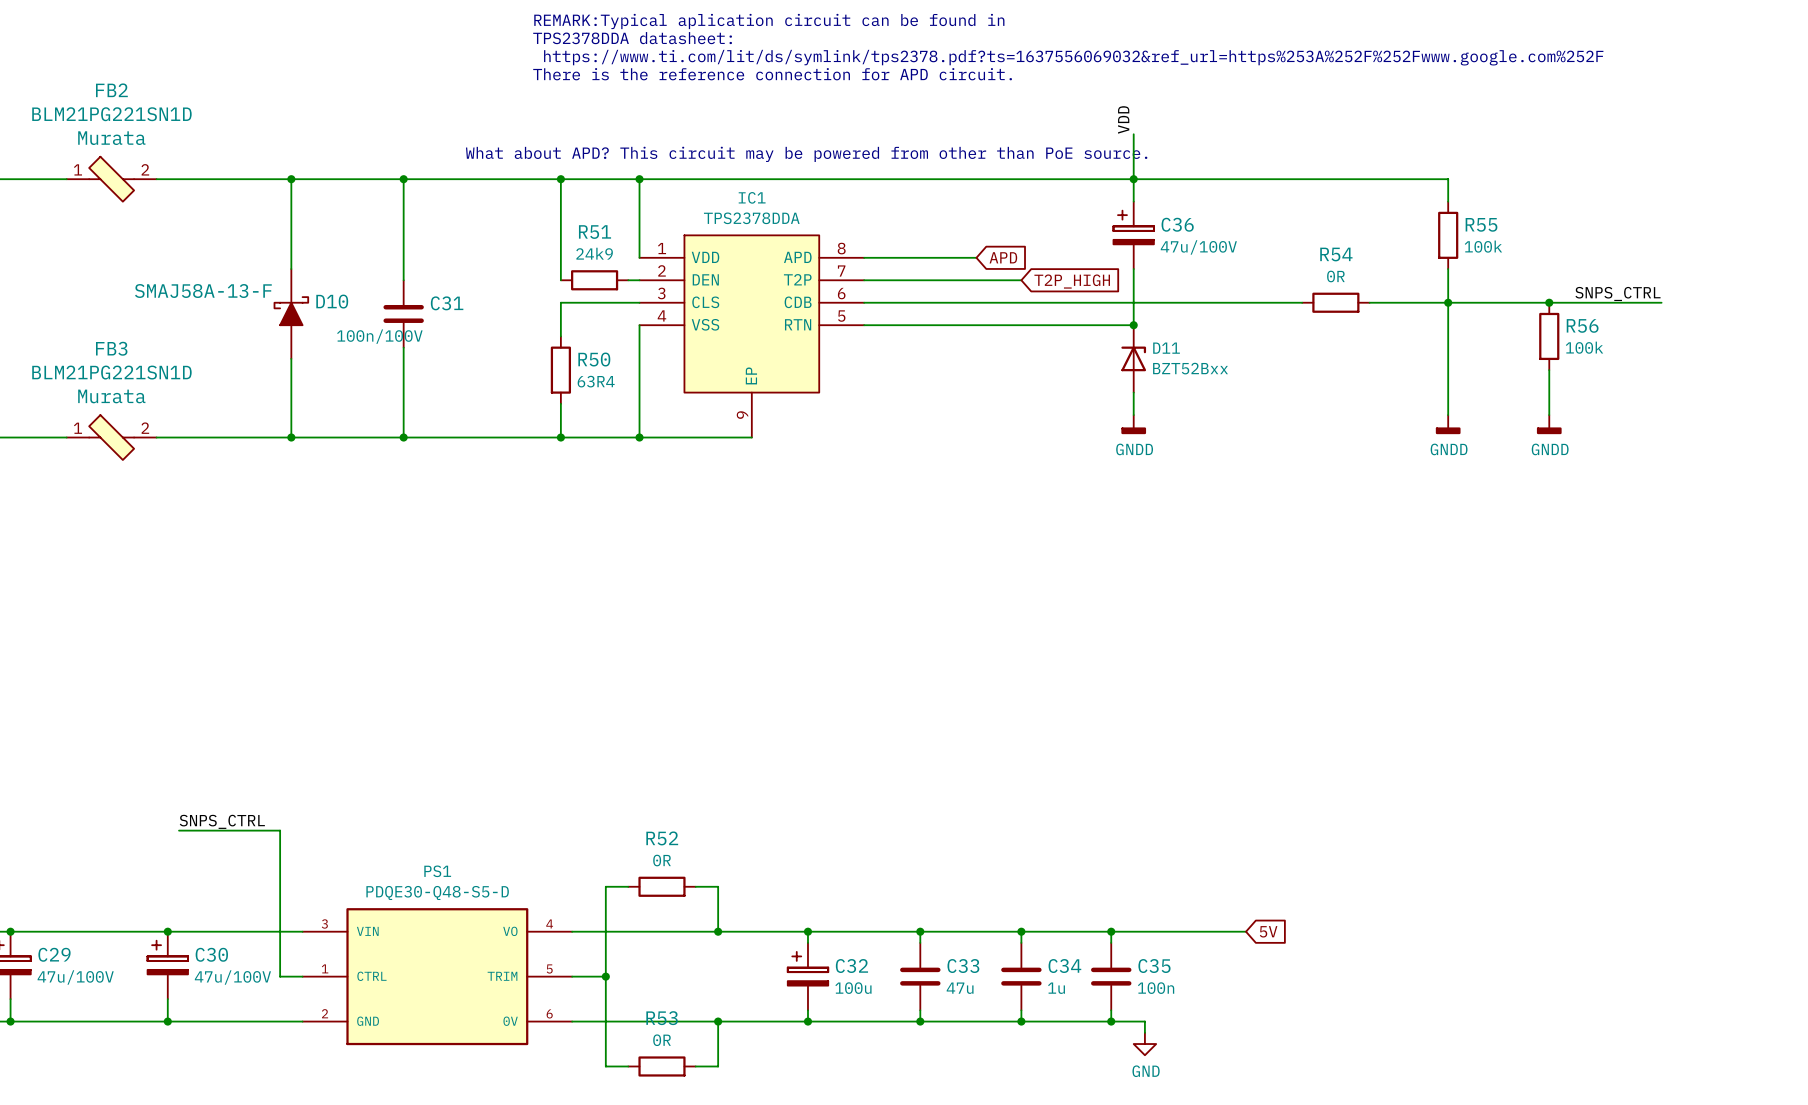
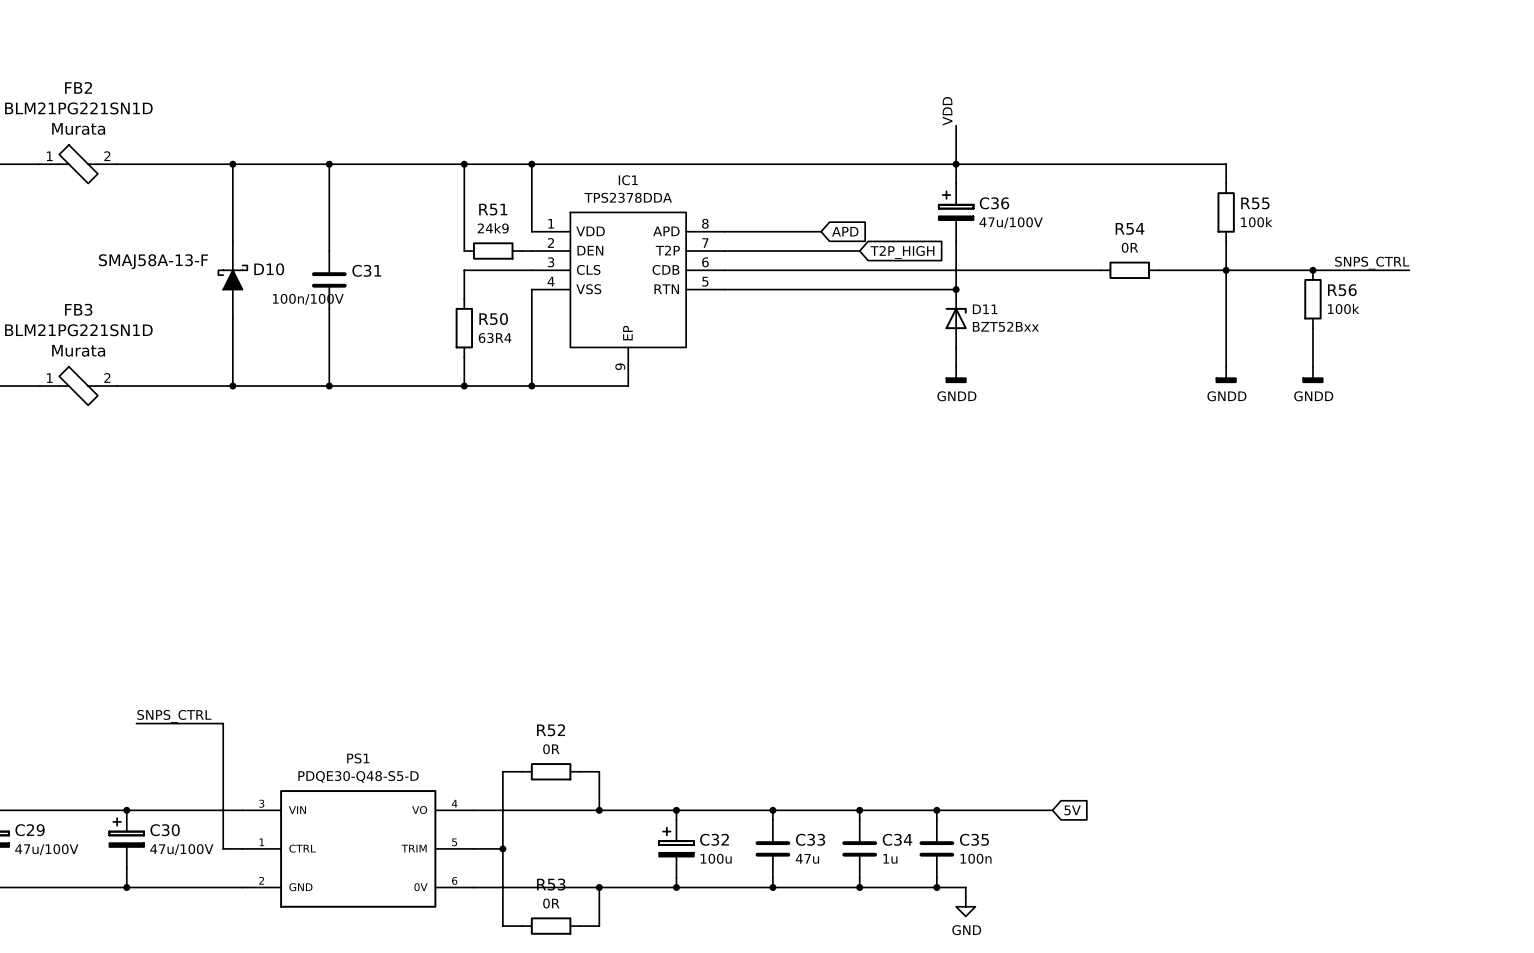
text: REMARK:Typical aplication circuit can be found in (769, 21) -> none
text: TPS2378DDA datasheet: (632, 38) -> none
text: https://www.ti.com/lit/ds/symlink/tps2378.pdf?ts=1637556069032&ref_url=https%253A%252F%252Fwww.google.com%252F (1073, 57) -> none
text: There is the reference connection for APD circuit. (772, 74) -> none
text: What about APD? This circuit may be powered from other than PoE source. (806, 154) -> none

